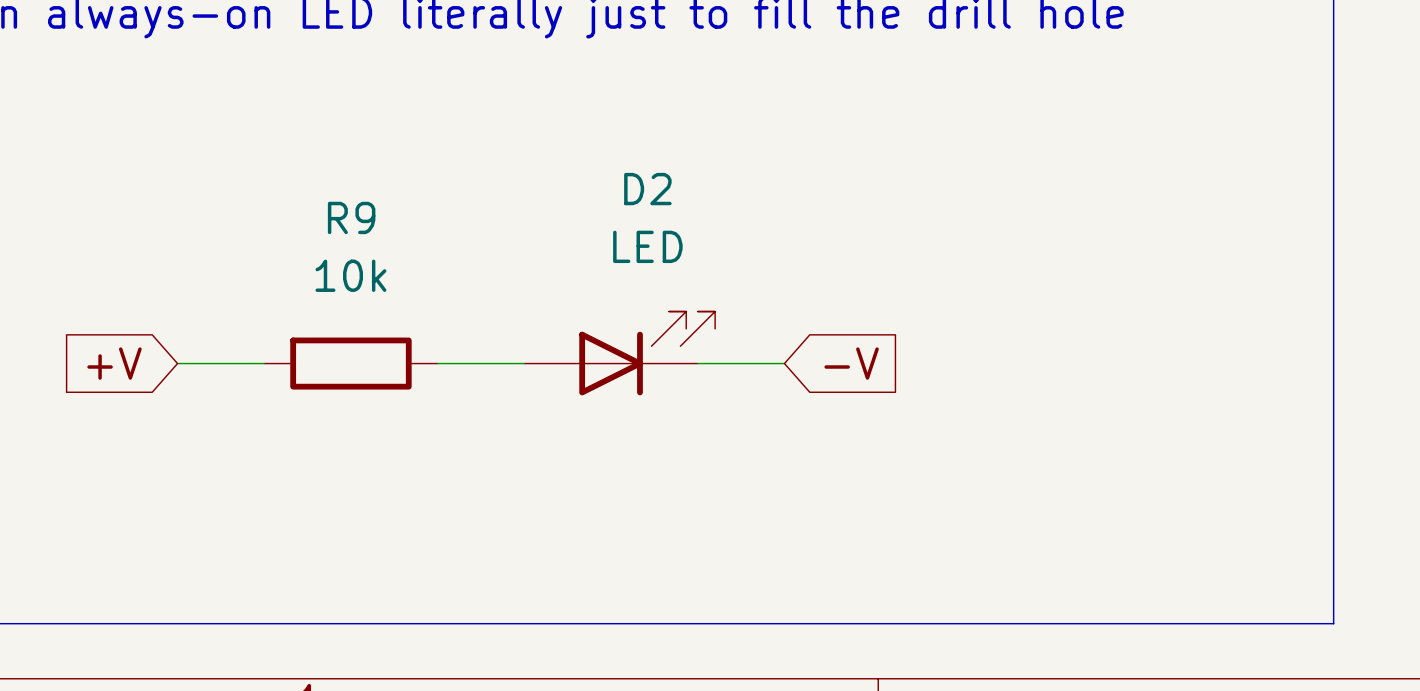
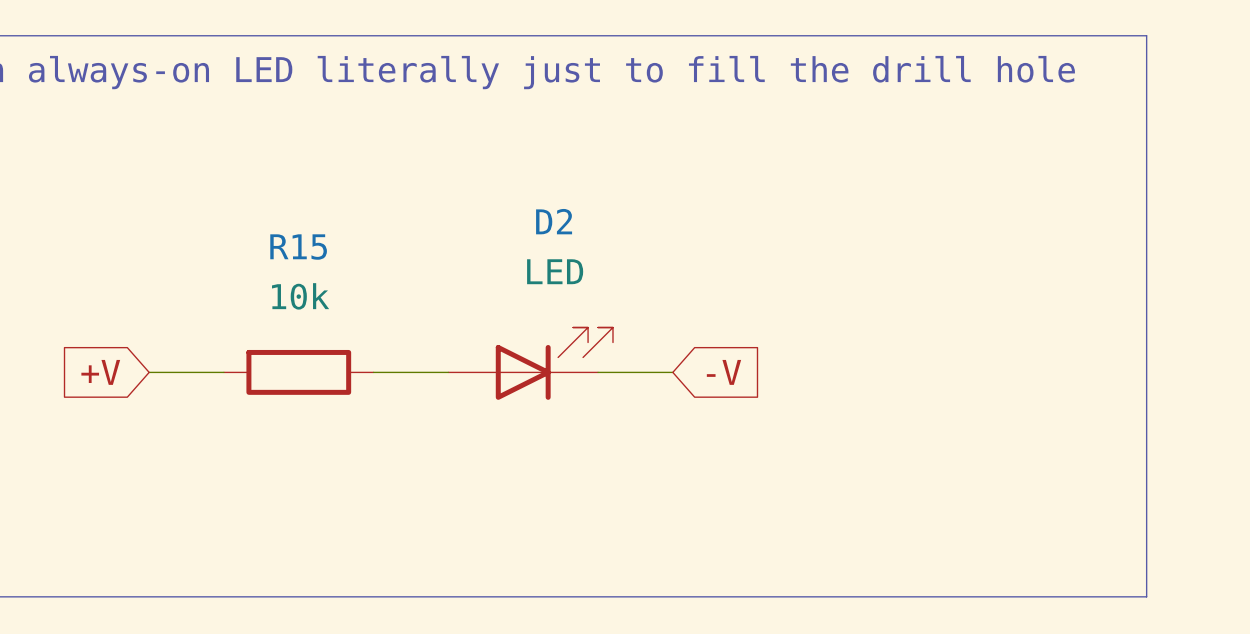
R9 name: R9 (351, 217) -> R15 (298, 247)

